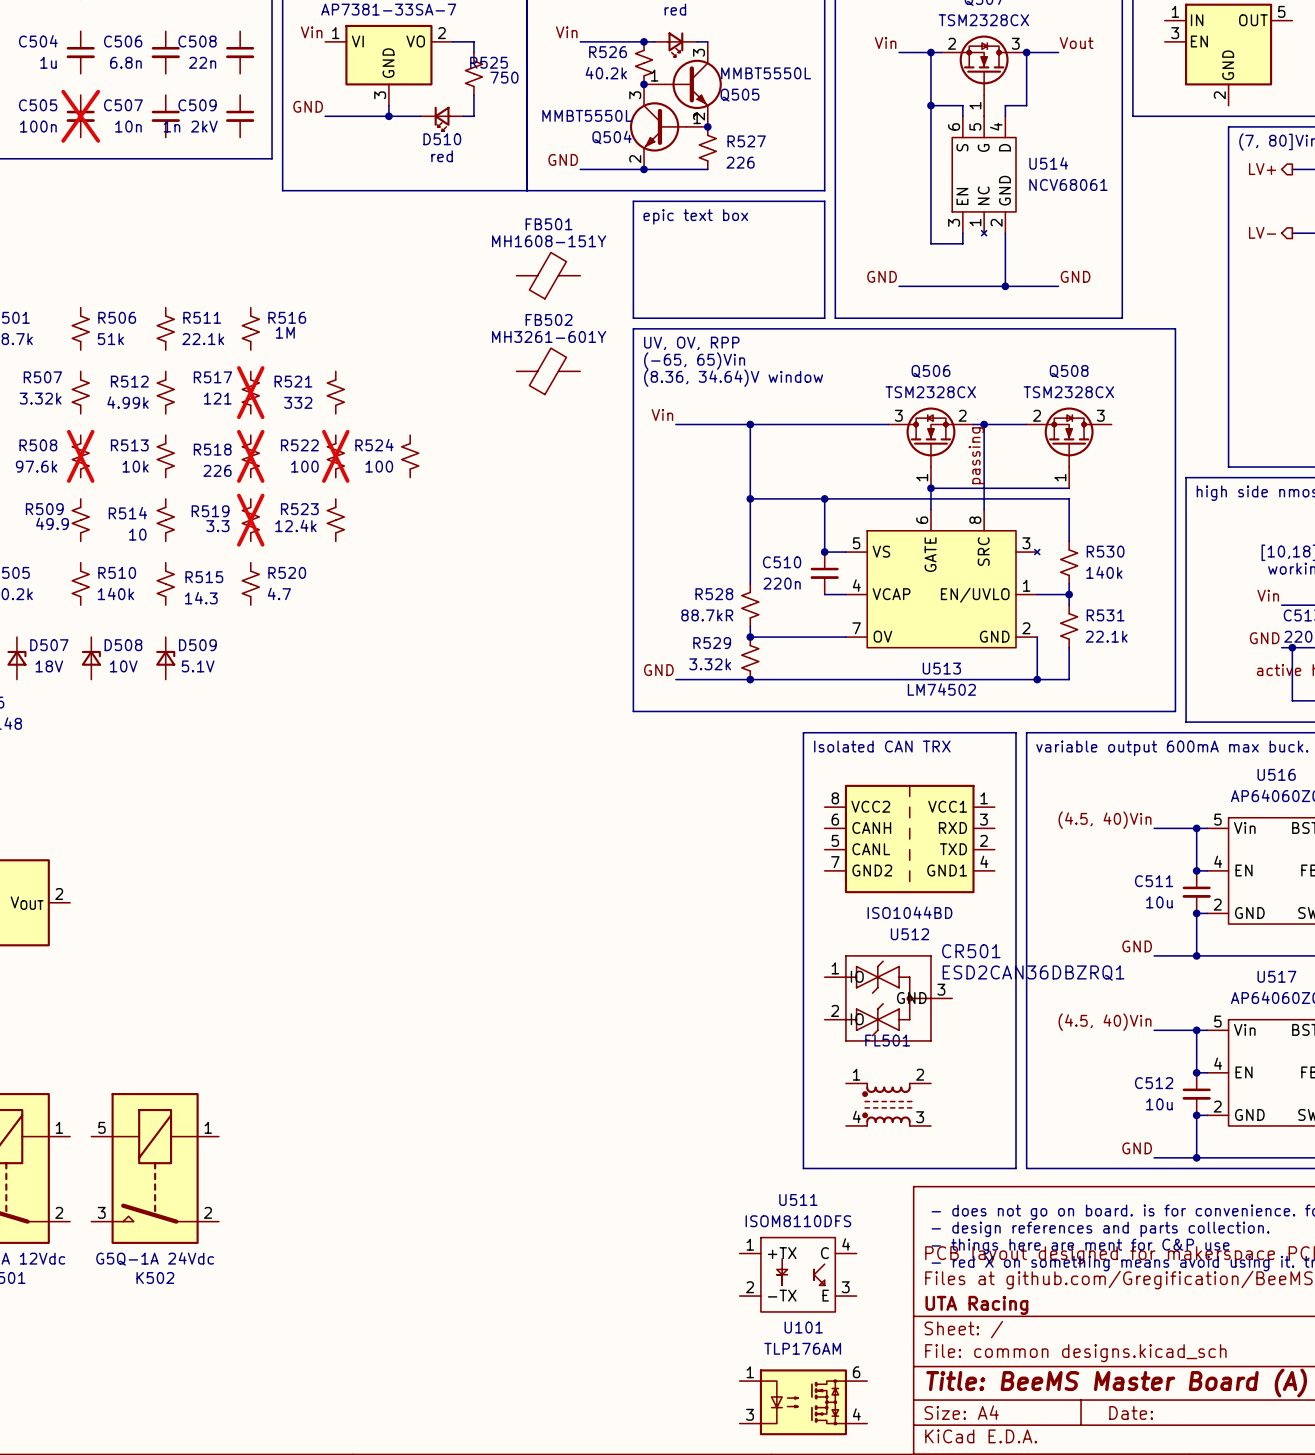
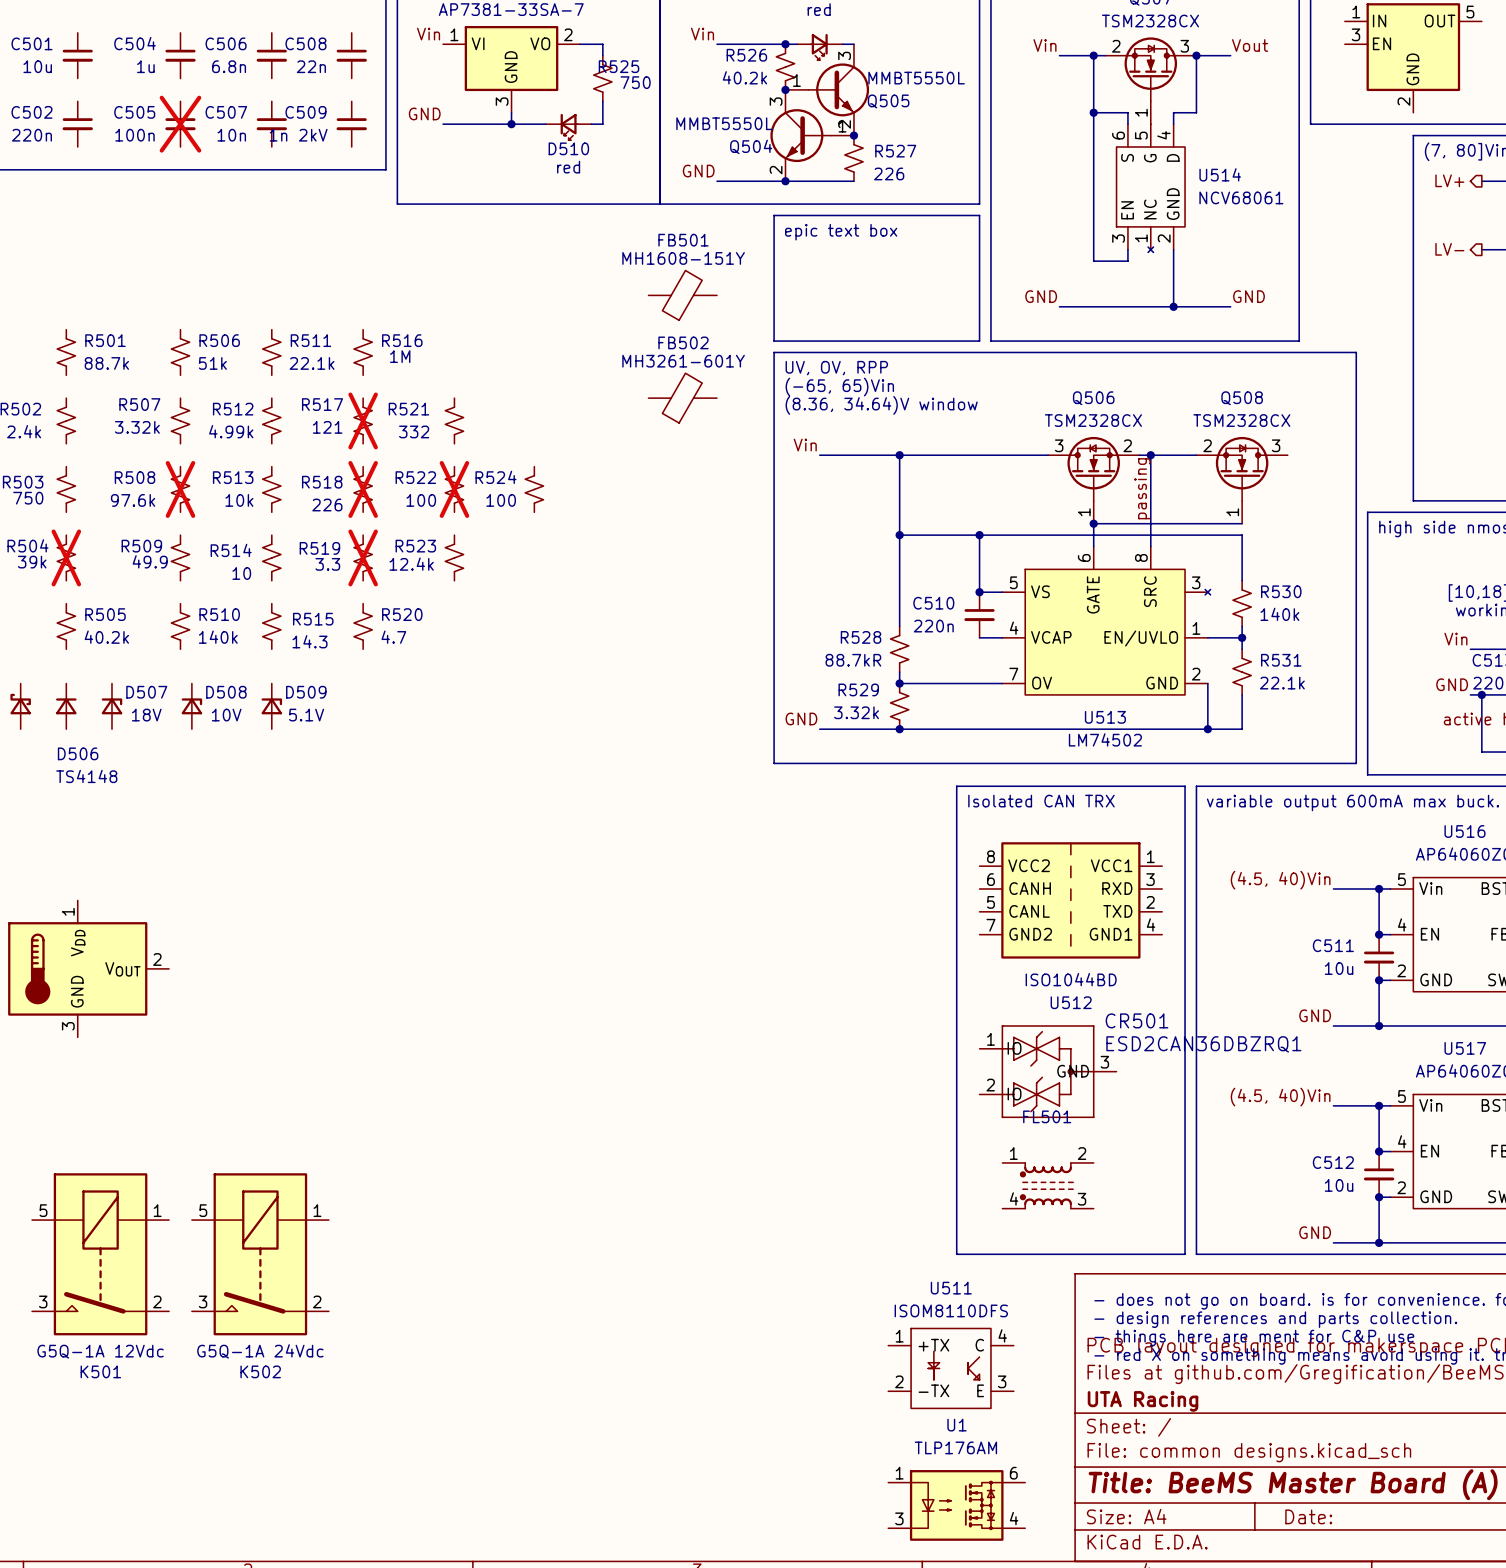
U101 name: U101 (803, 1327) -> U1 (956, 1425)

